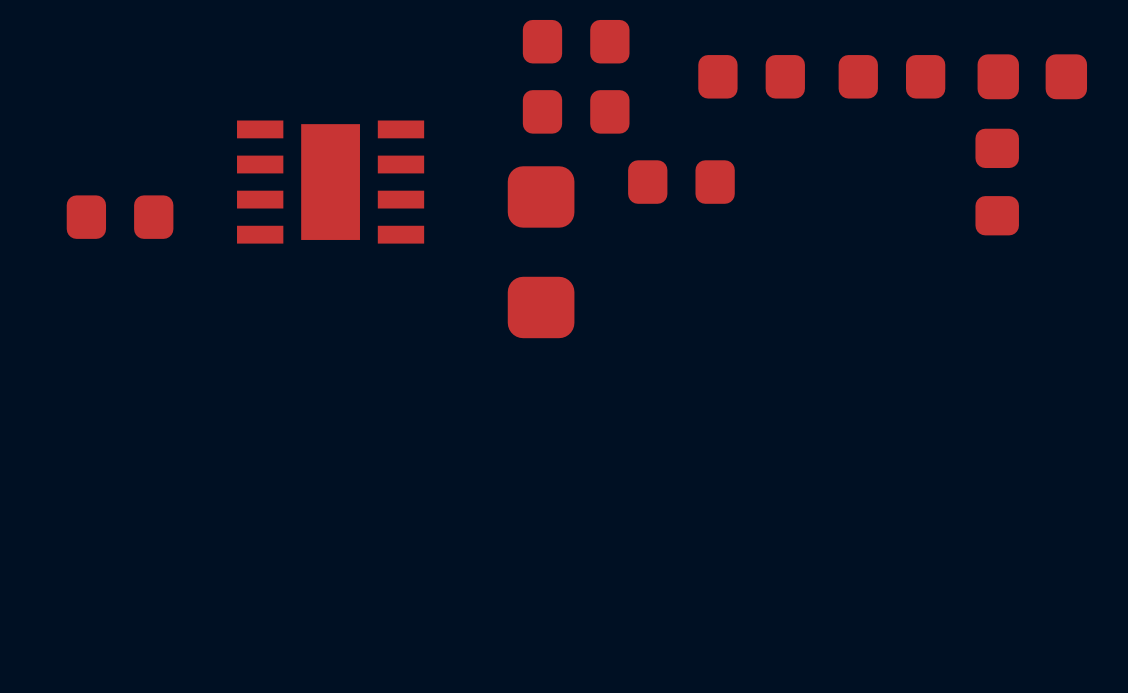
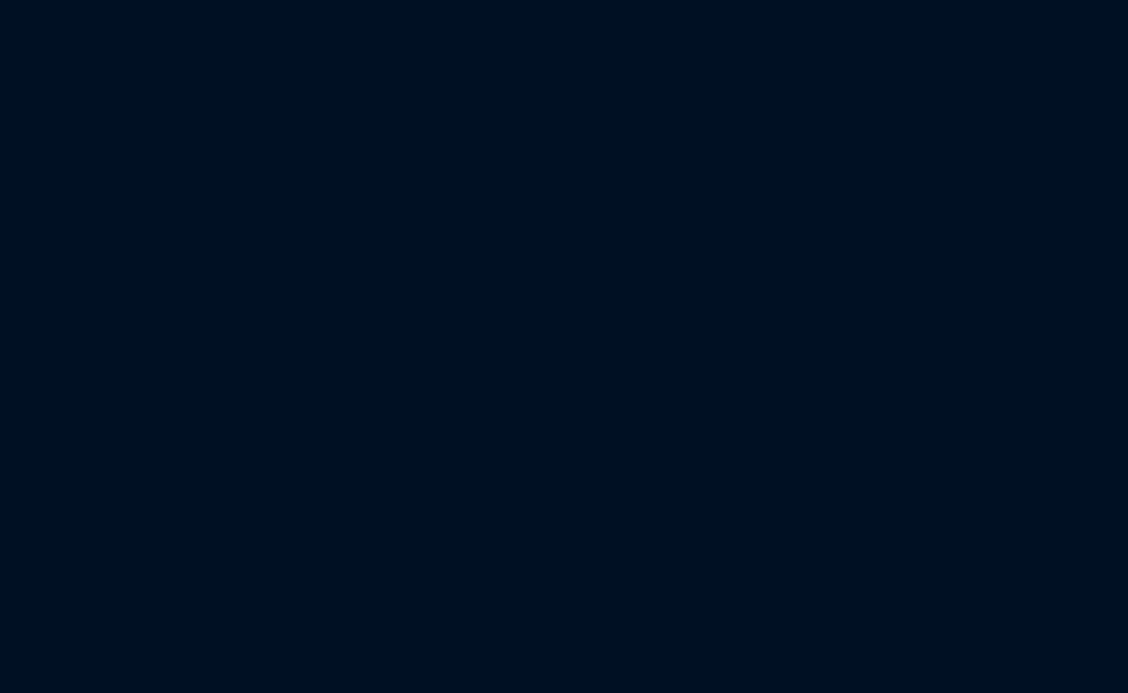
part: (576, 41) -> none
part: (751, 76) -> none
part: (891, 76) -> none
part: (1032, 76) -> none
part: (576, 111) -> none
part: (330, 182) -> none
part: (681, 182) -> none
part: (997, 182) -> none
part: (120, 217) -> none
part: (541, 252) -> none

